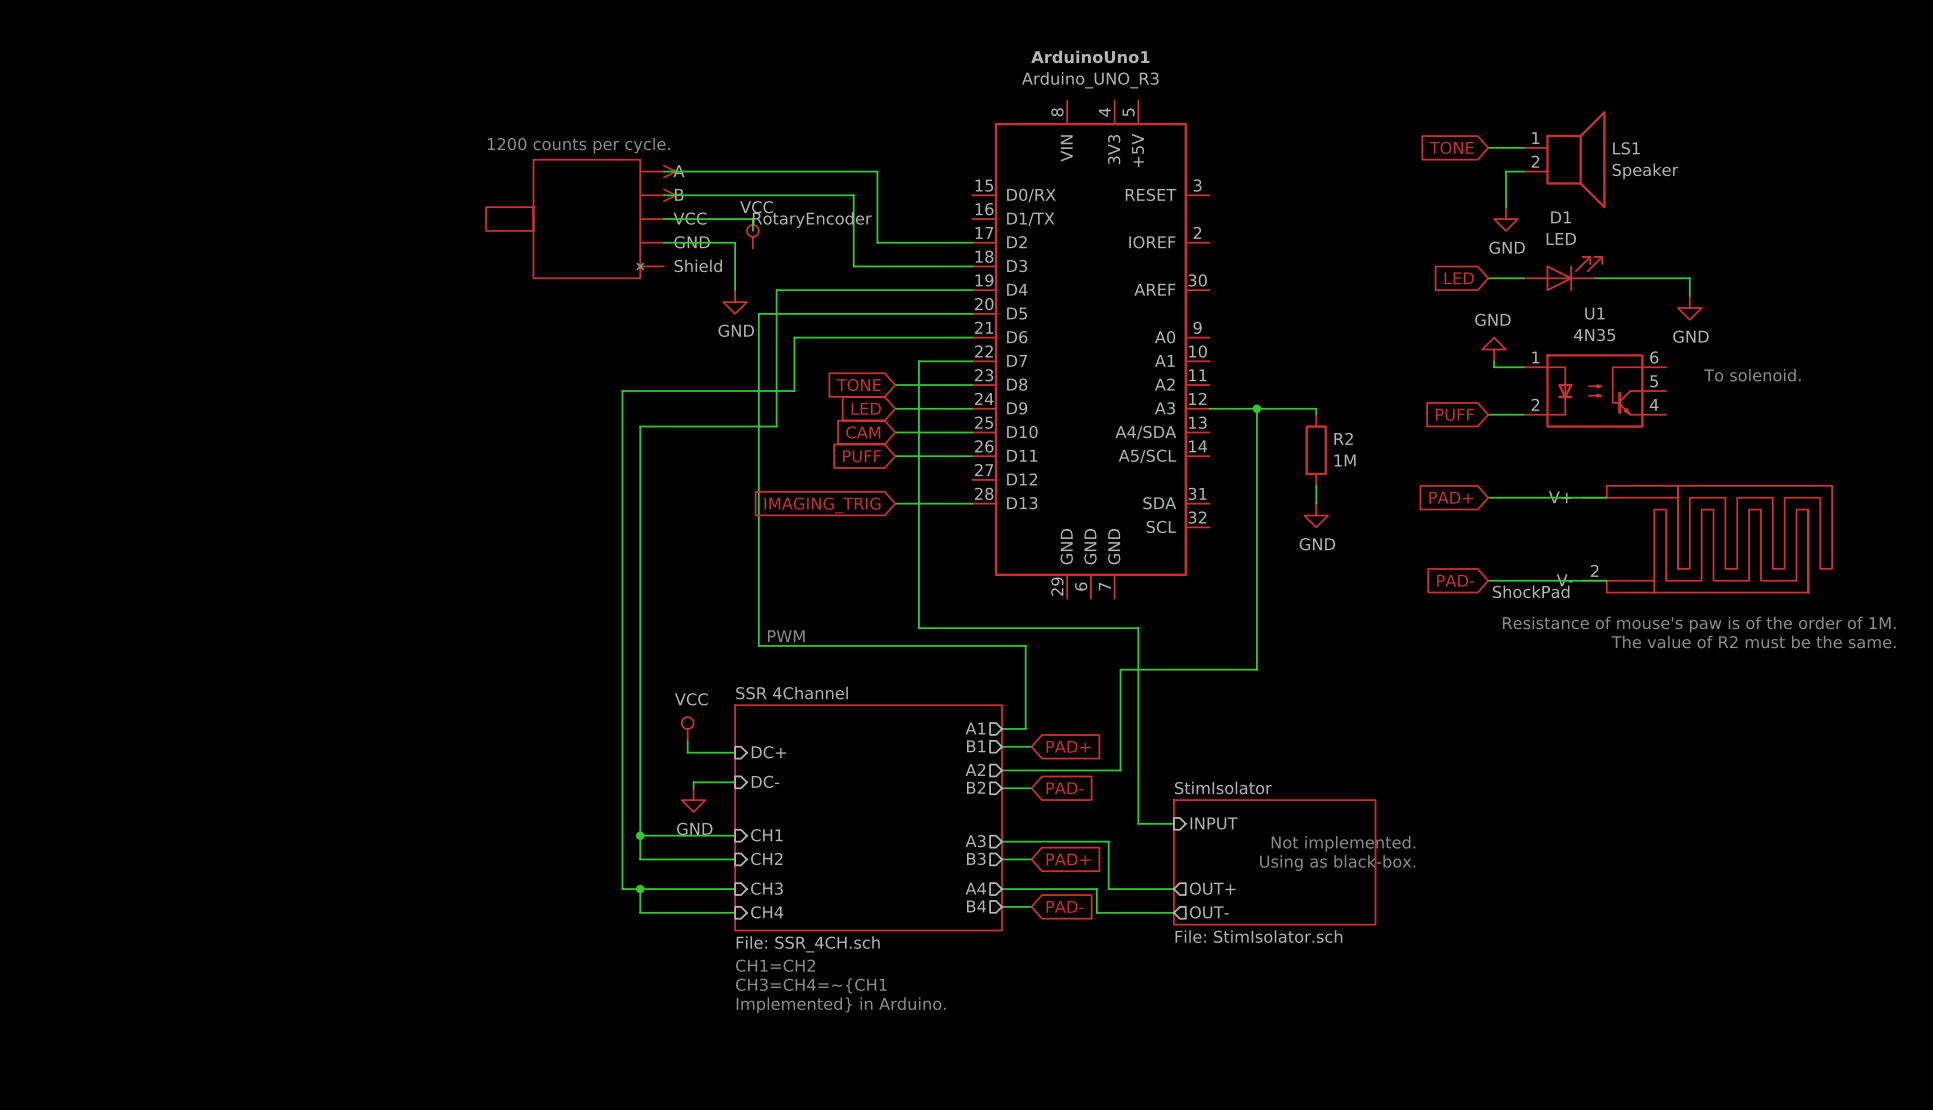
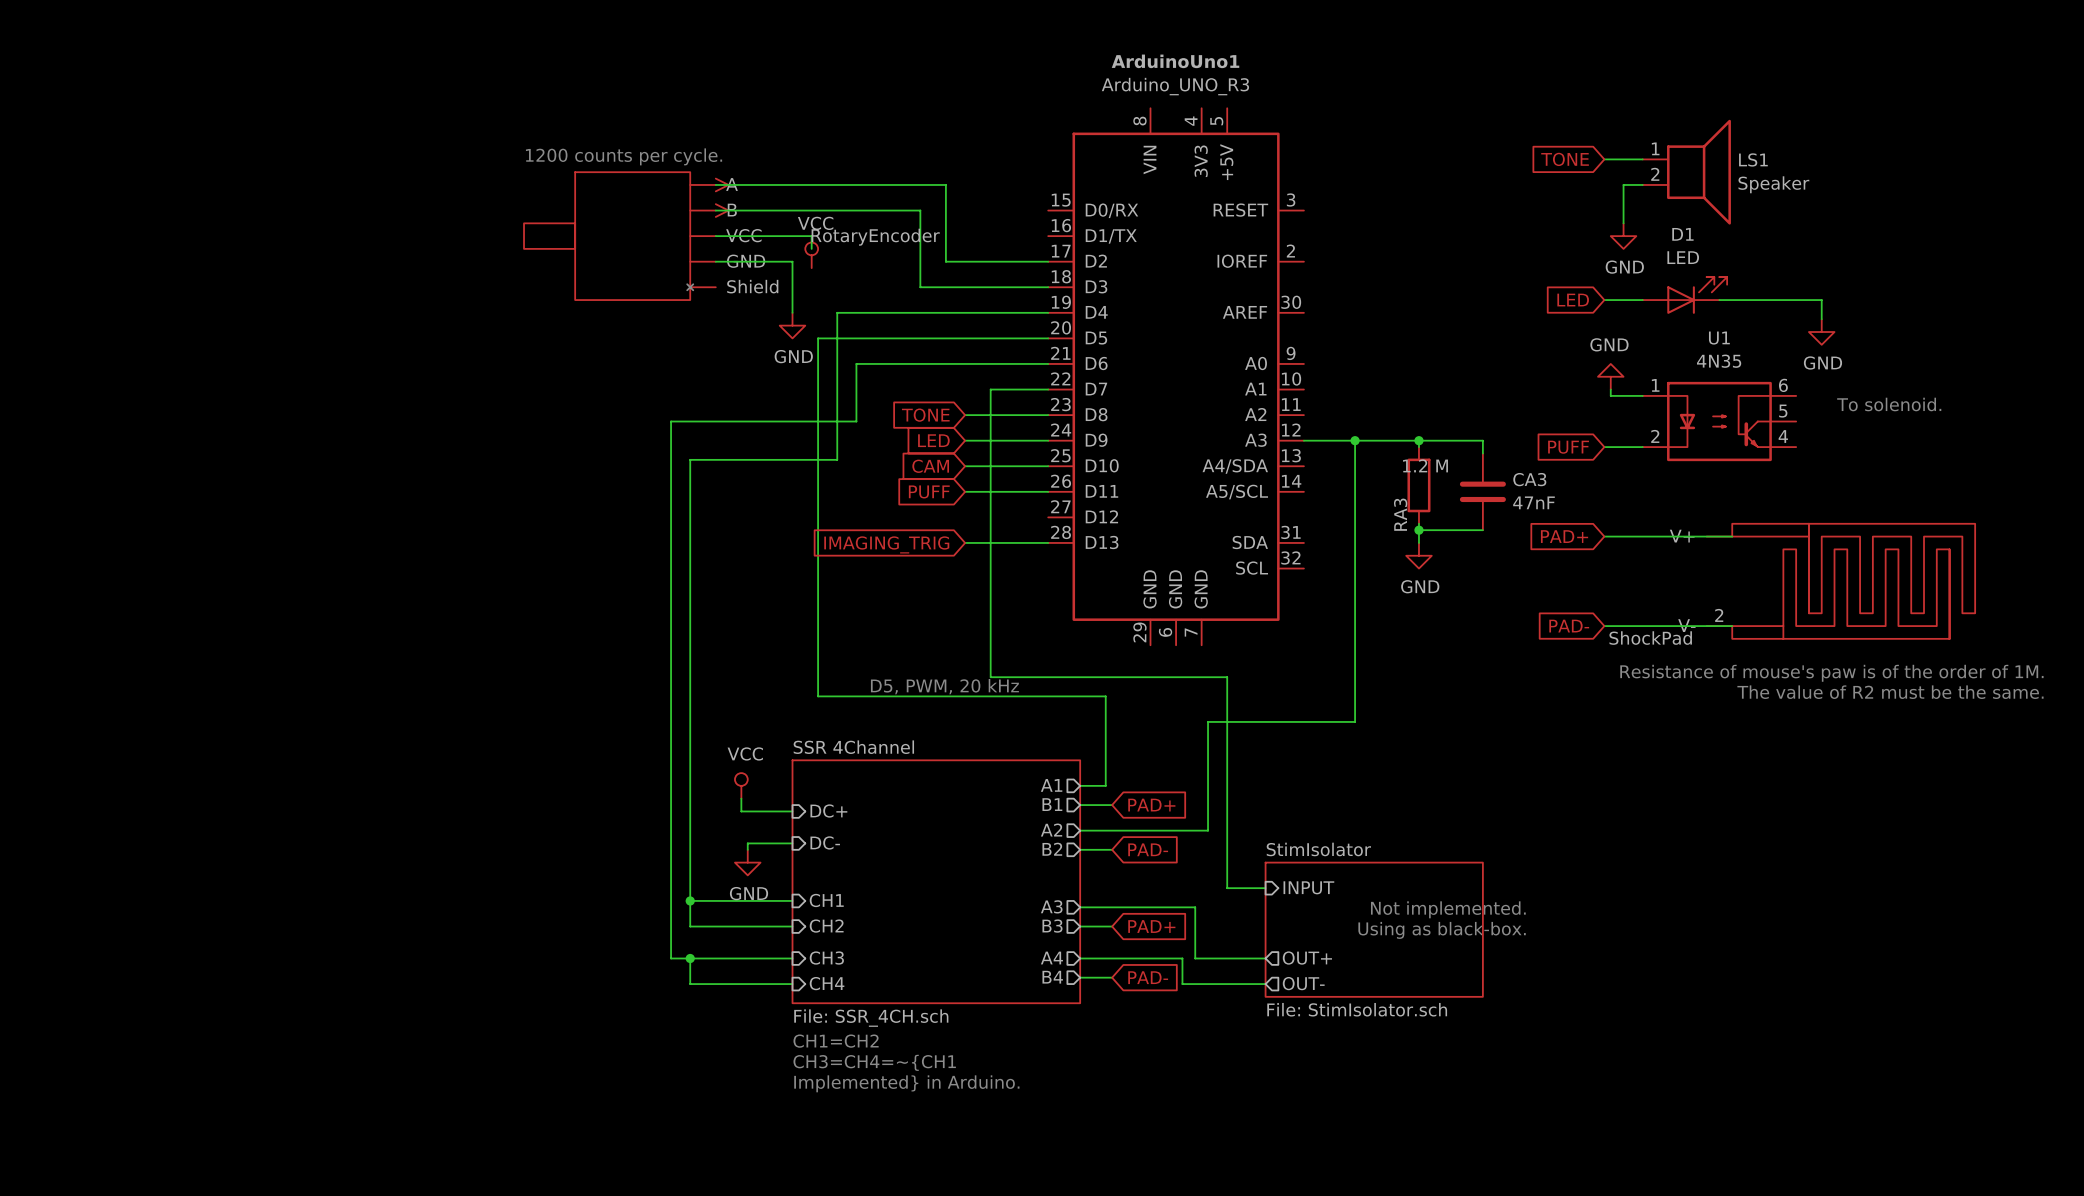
wire: none -> (1418, 440) (1482, 440) (1482, 453)
junction: none -> (1418, 440)
R2 name: R2 (1343, 438) -> RA3 (1400, 514)
CA3: none -> 47nF (1482, 491)
R2 value: 1M (1345, 460) -> 1.2 M (1425, 465)
wire: none -> (1418, 530) (1482, 530)
junction: none -> (1418, 530)
text: PWM (786, 636) -> D5, PWM, 20 kHz (944, 686)

